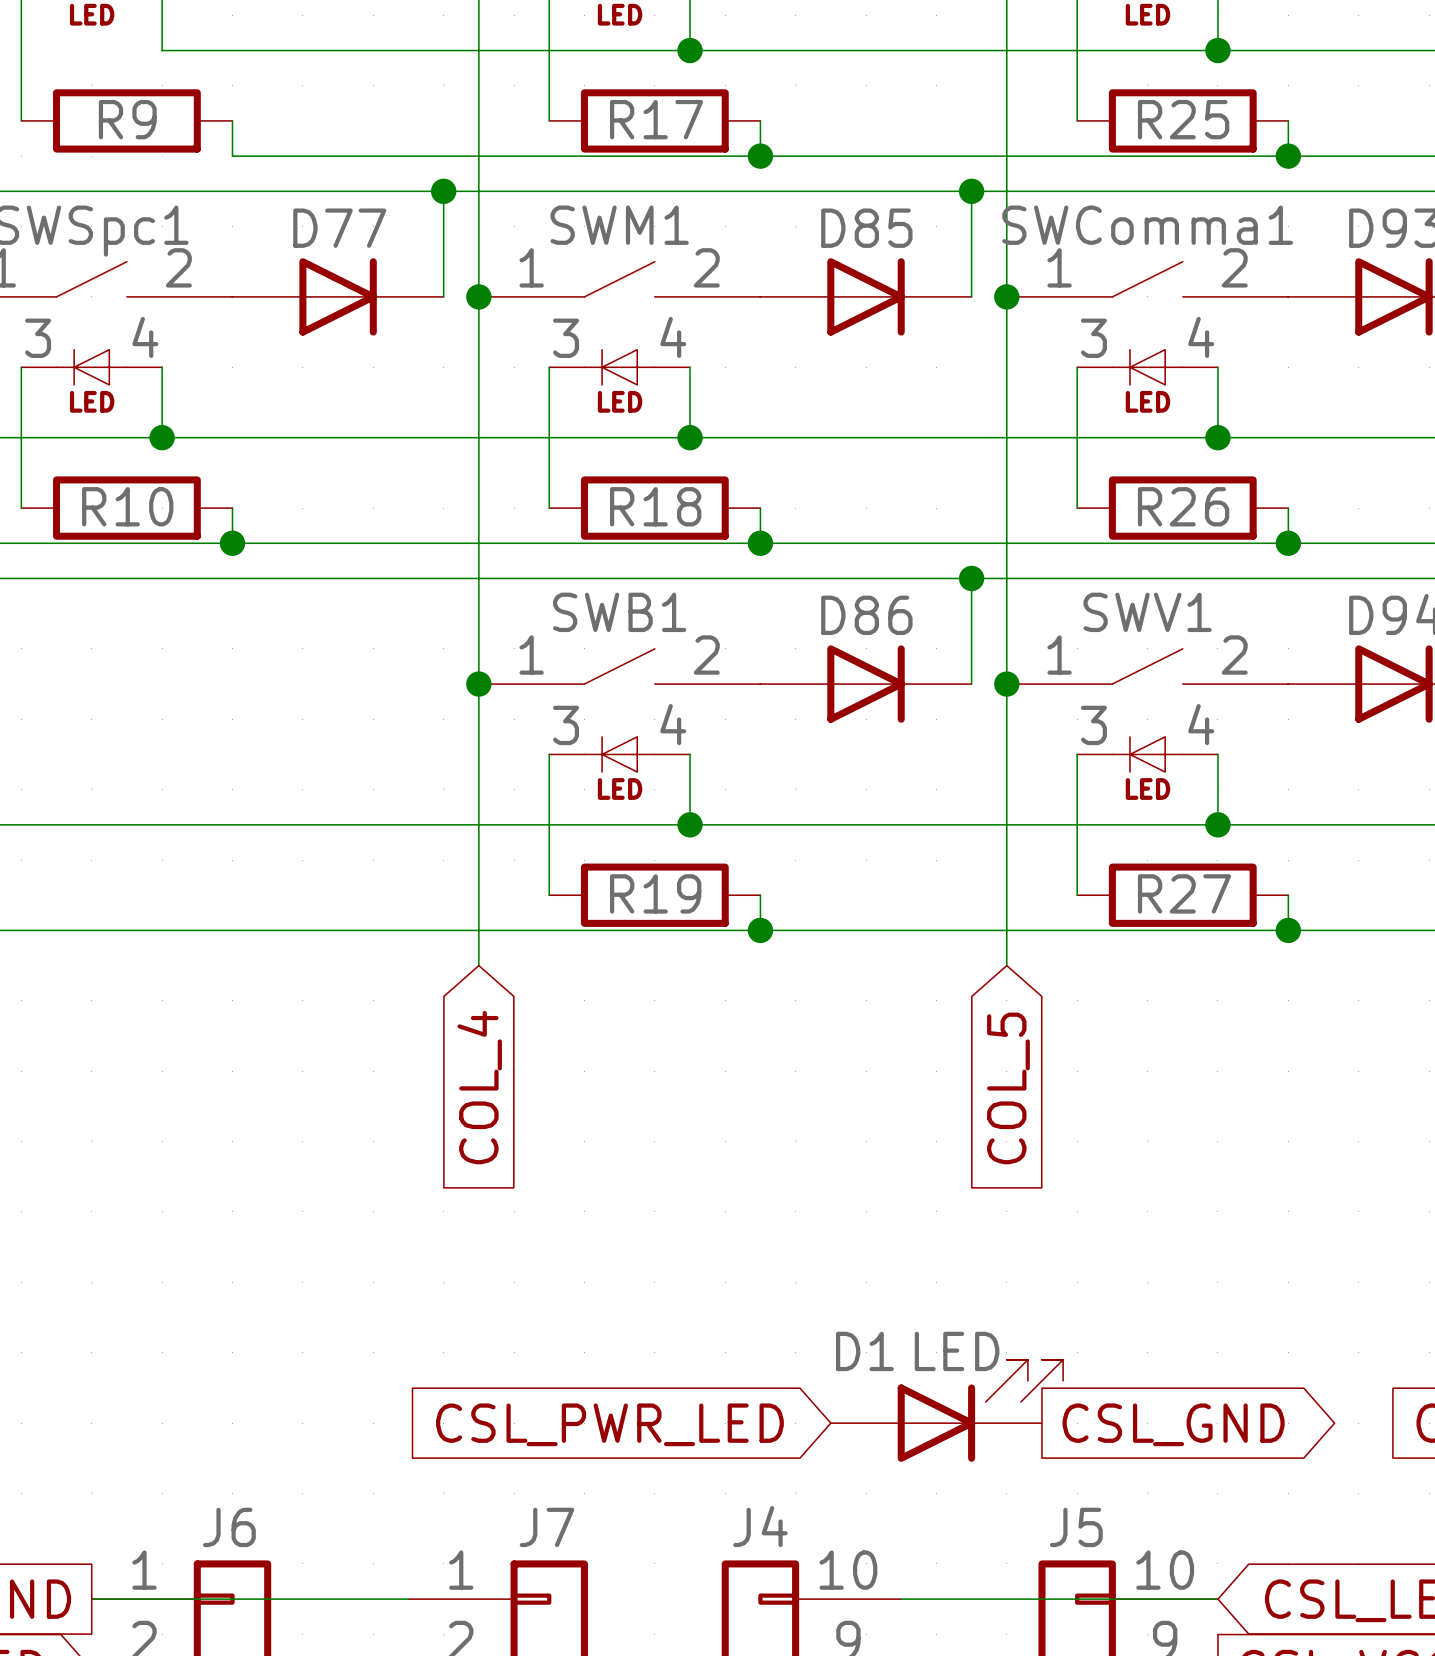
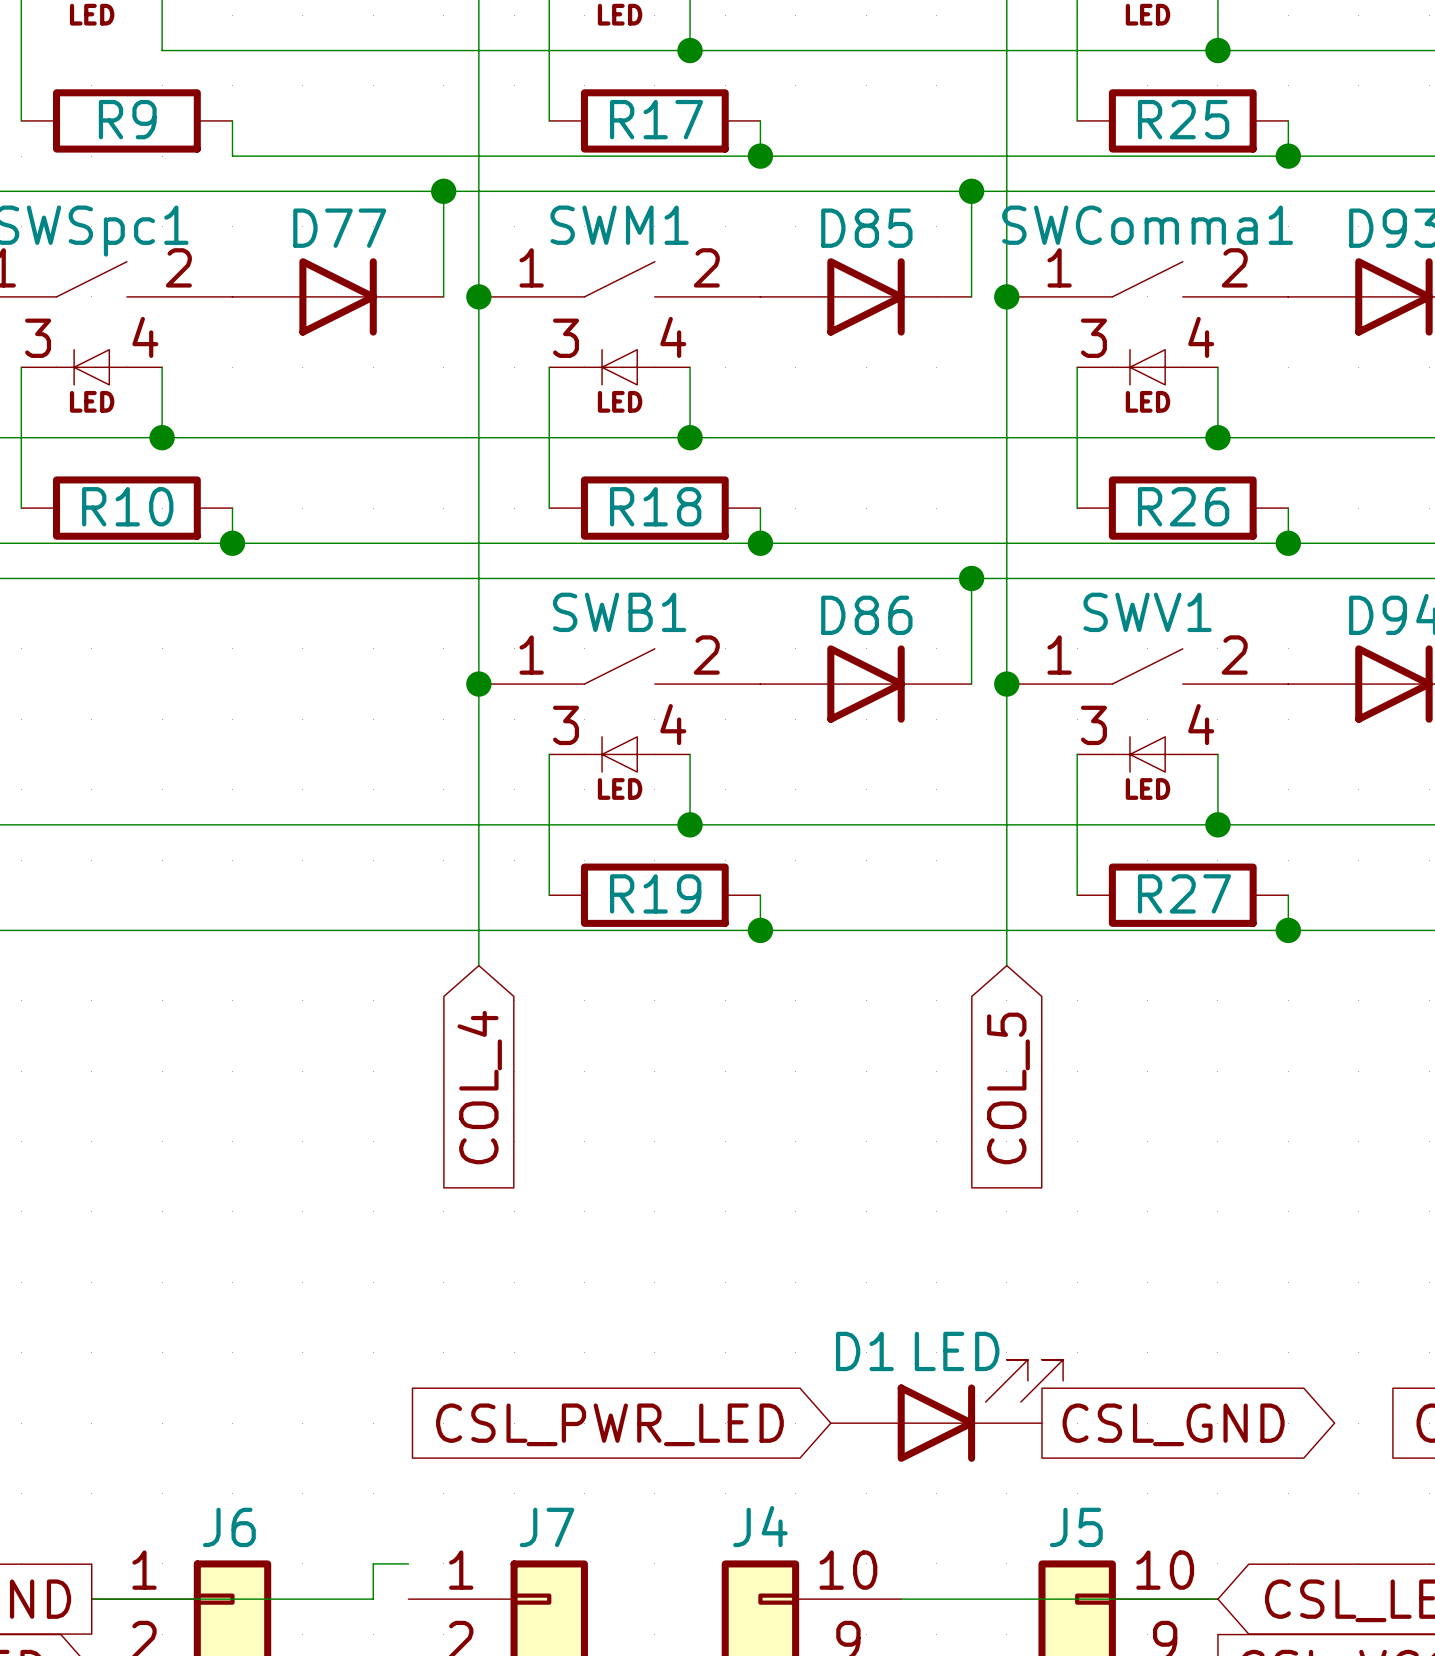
wire: (373, 1599) (408, 1599) -> (373, 1599) (373, 1563) (408, 1563)

